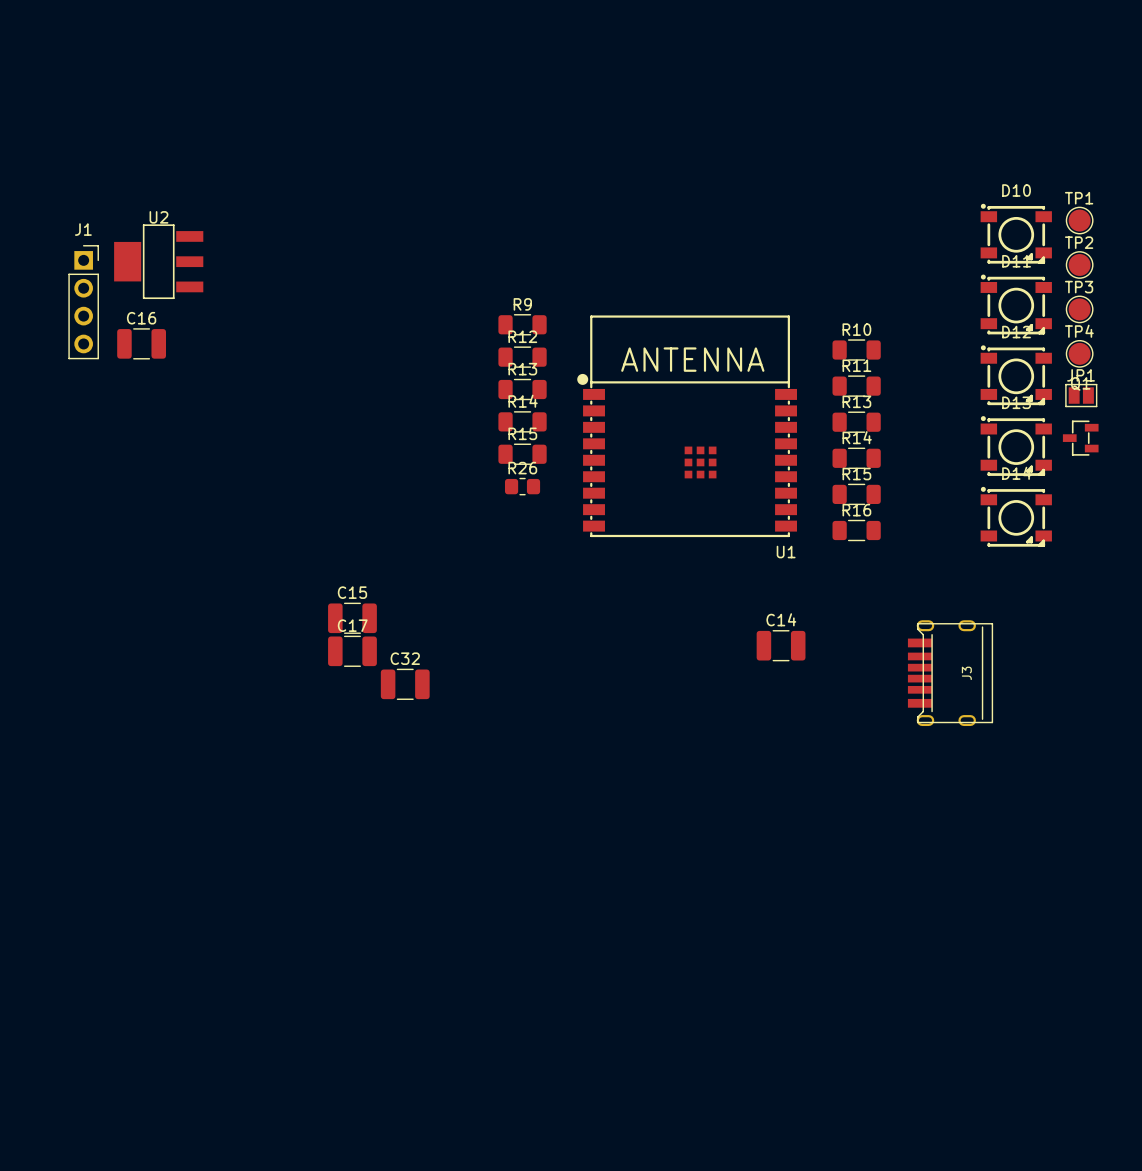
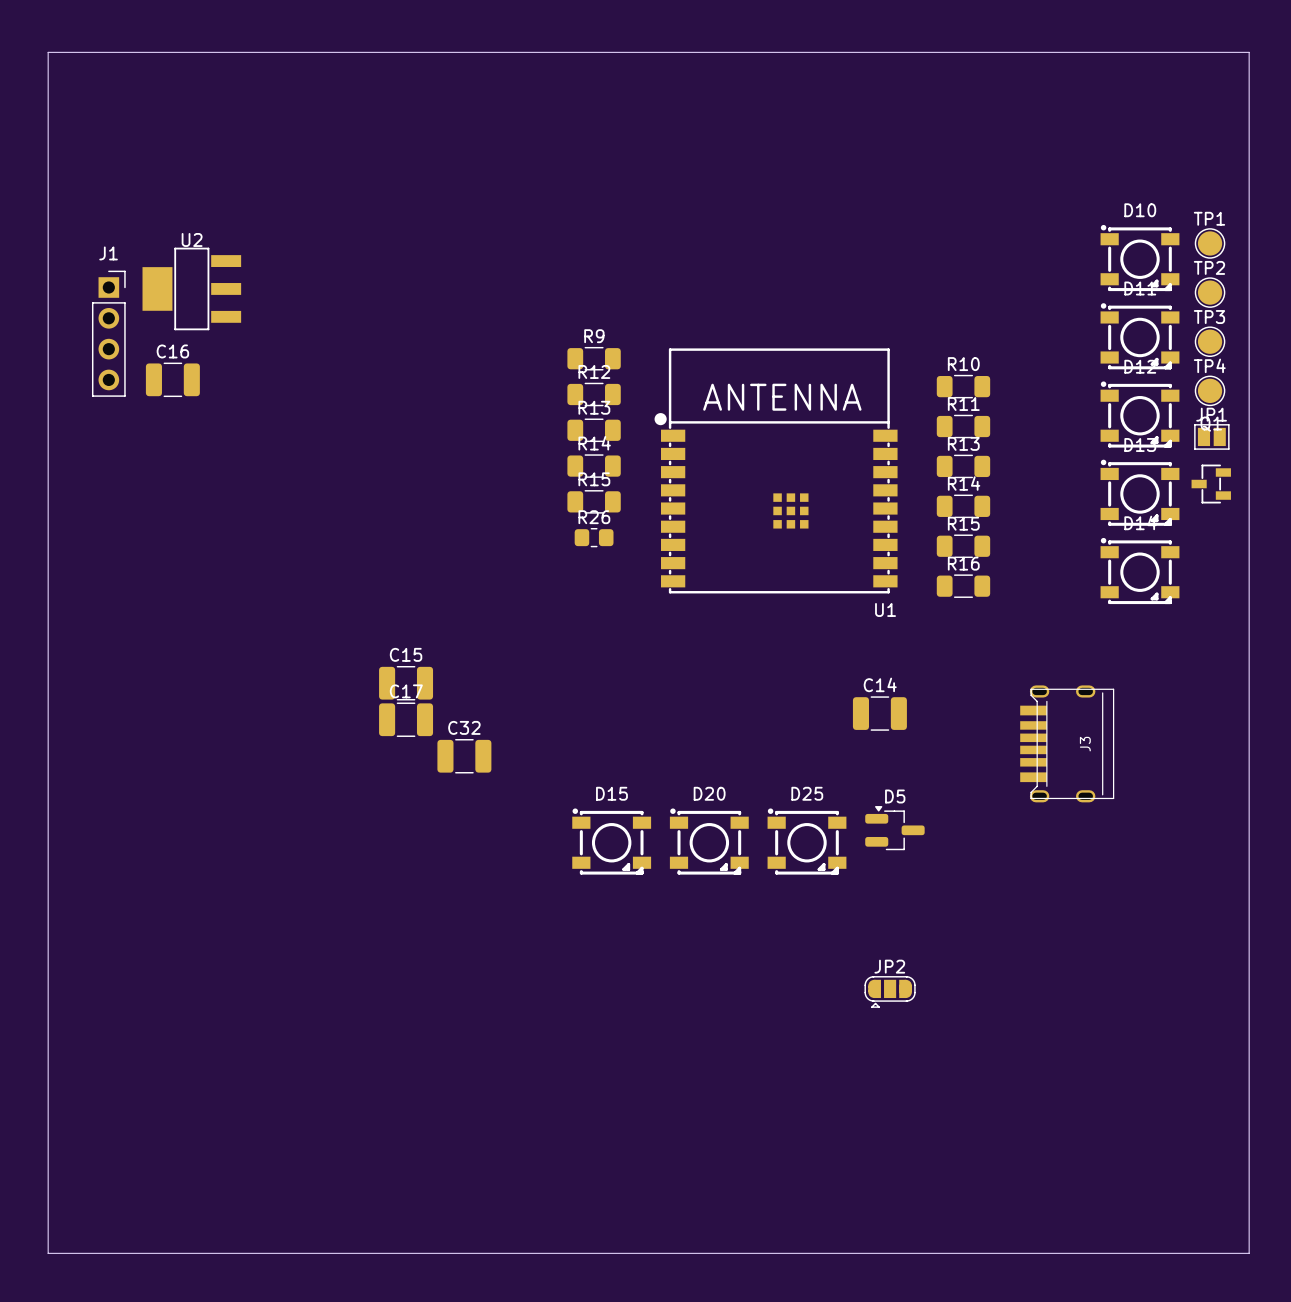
board edge: none -> (48, 52) (1249, 52) (1249, 1253) (48, 1253) (48, 52)
D5: none -> (894, 828)
D15: none -> (611, 841)
D20: none -> (709, 841)
D25: none -> (806, 841)
JP2: none -> (890, 991)

